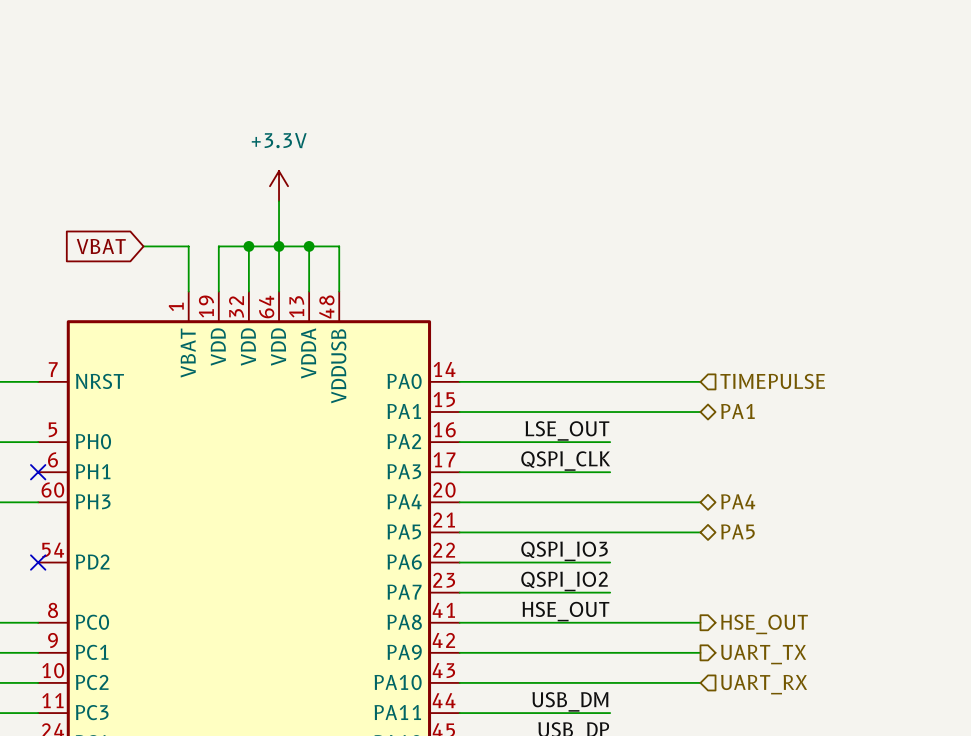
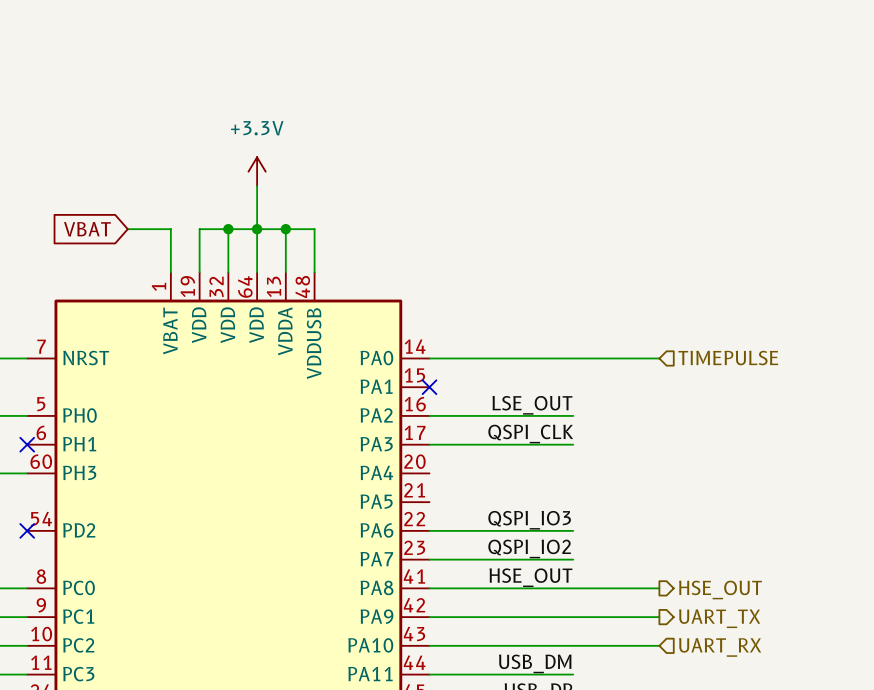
hierarchical label: PA1 (737, 411) -> none
wire: (459, 412) (700, 412) -> none
no-connect mark: none -> (429, 387)
hierarchical label: PA4 (738, 501) -> none
wire: (459, 502) (700, 502) -> none
hierarchical label: PA5 (737, 531) -> none
wire: (459, 532) (700, 532) -> none

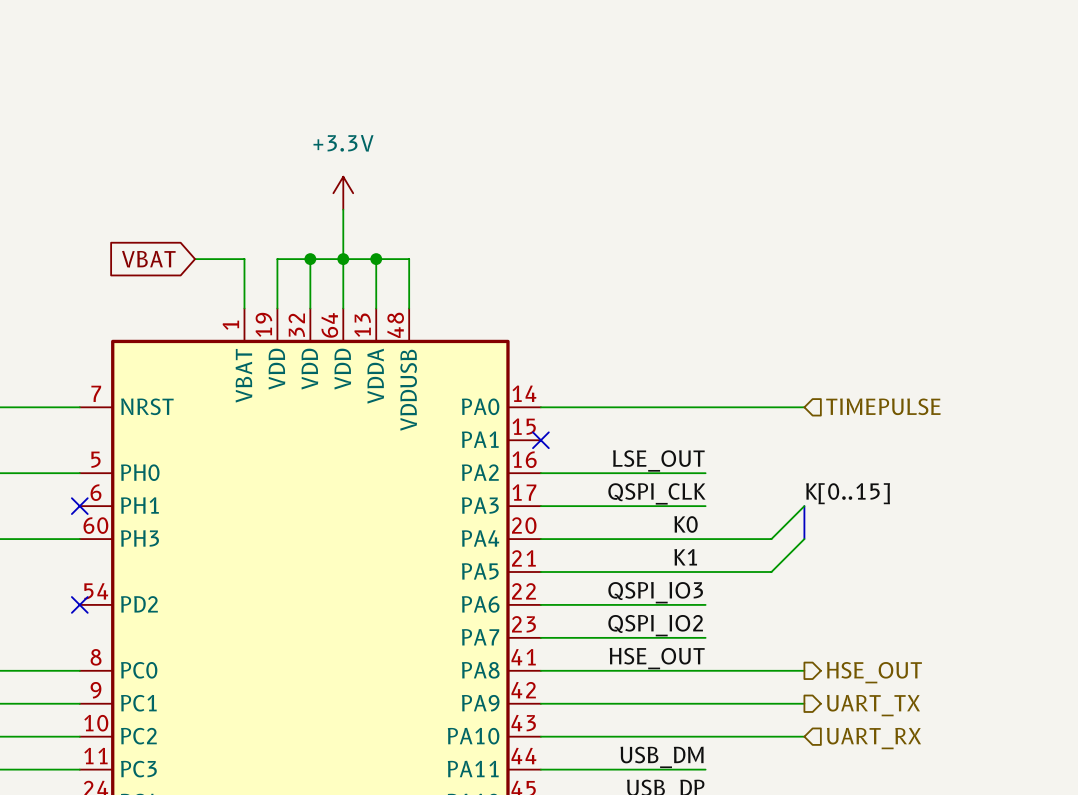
label: none -> K[0..15] (848, 493)
wire: none -> (804, 506) (771, 539) (540, 539)
bus: none -> (804, 506) (804, 539)
label: none -> K0 (686, 524)
wire: none -> (804, 539) (771, 572) (540, 572)
label: none -> K1 (685, 557)

